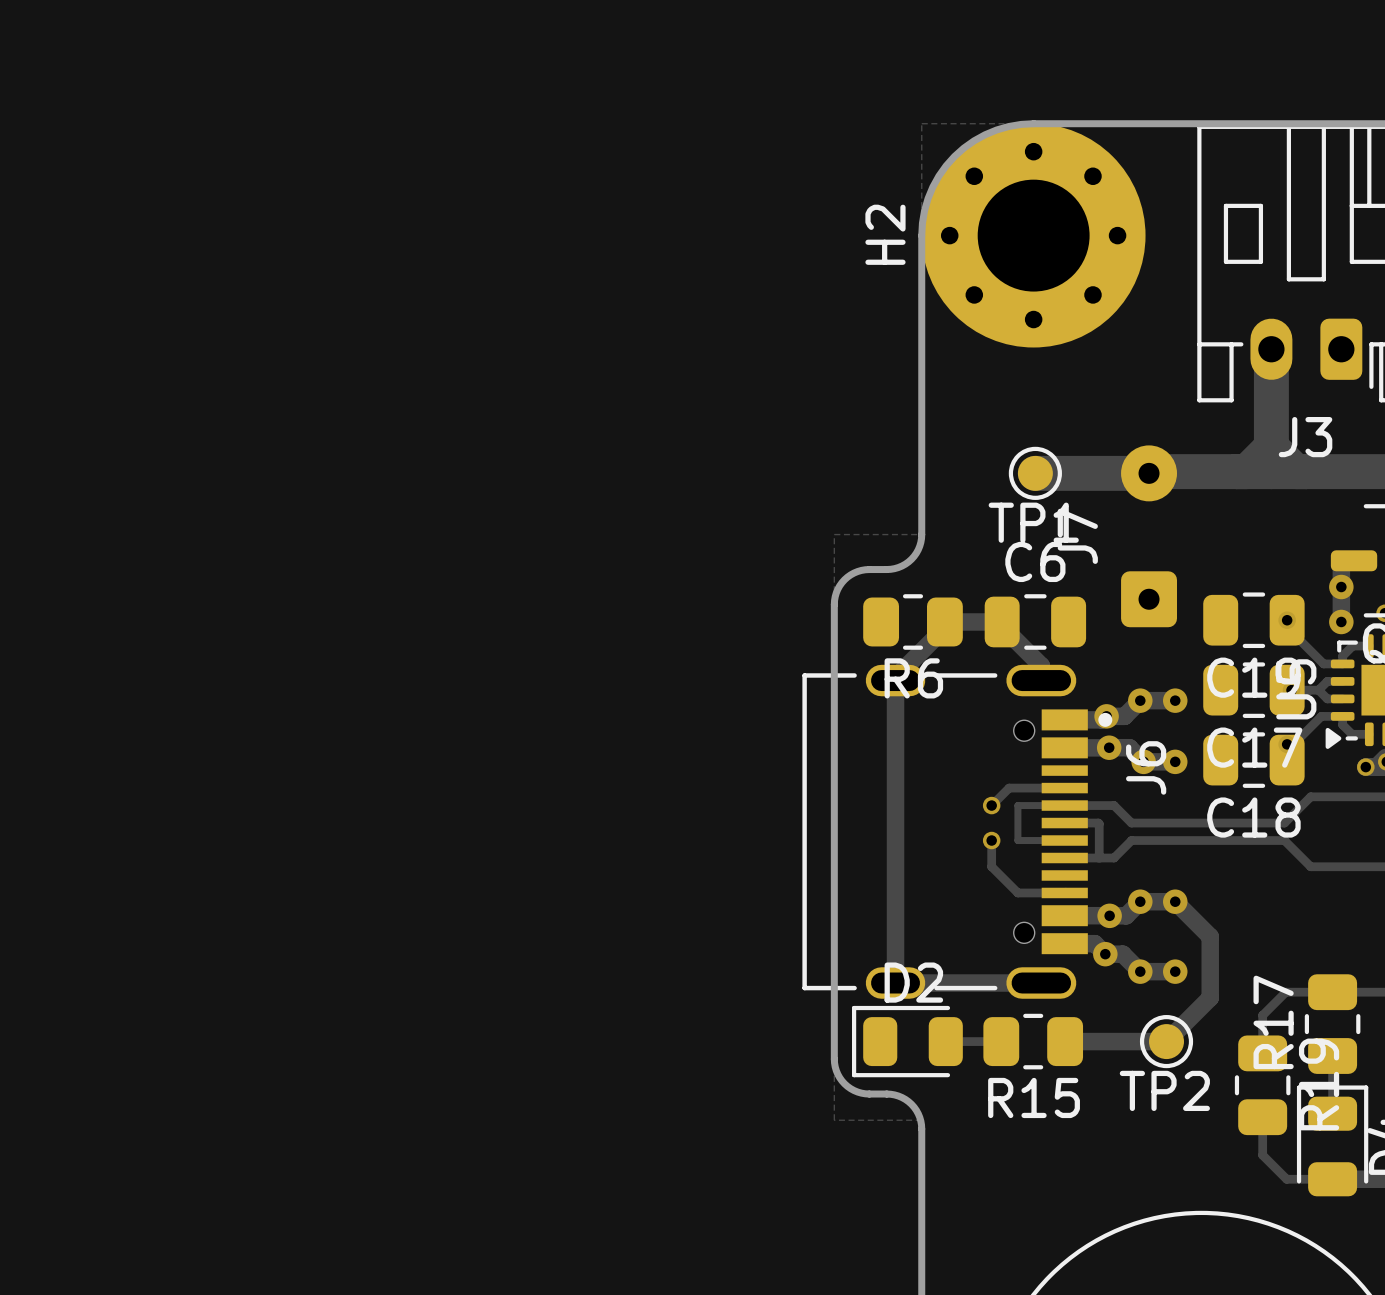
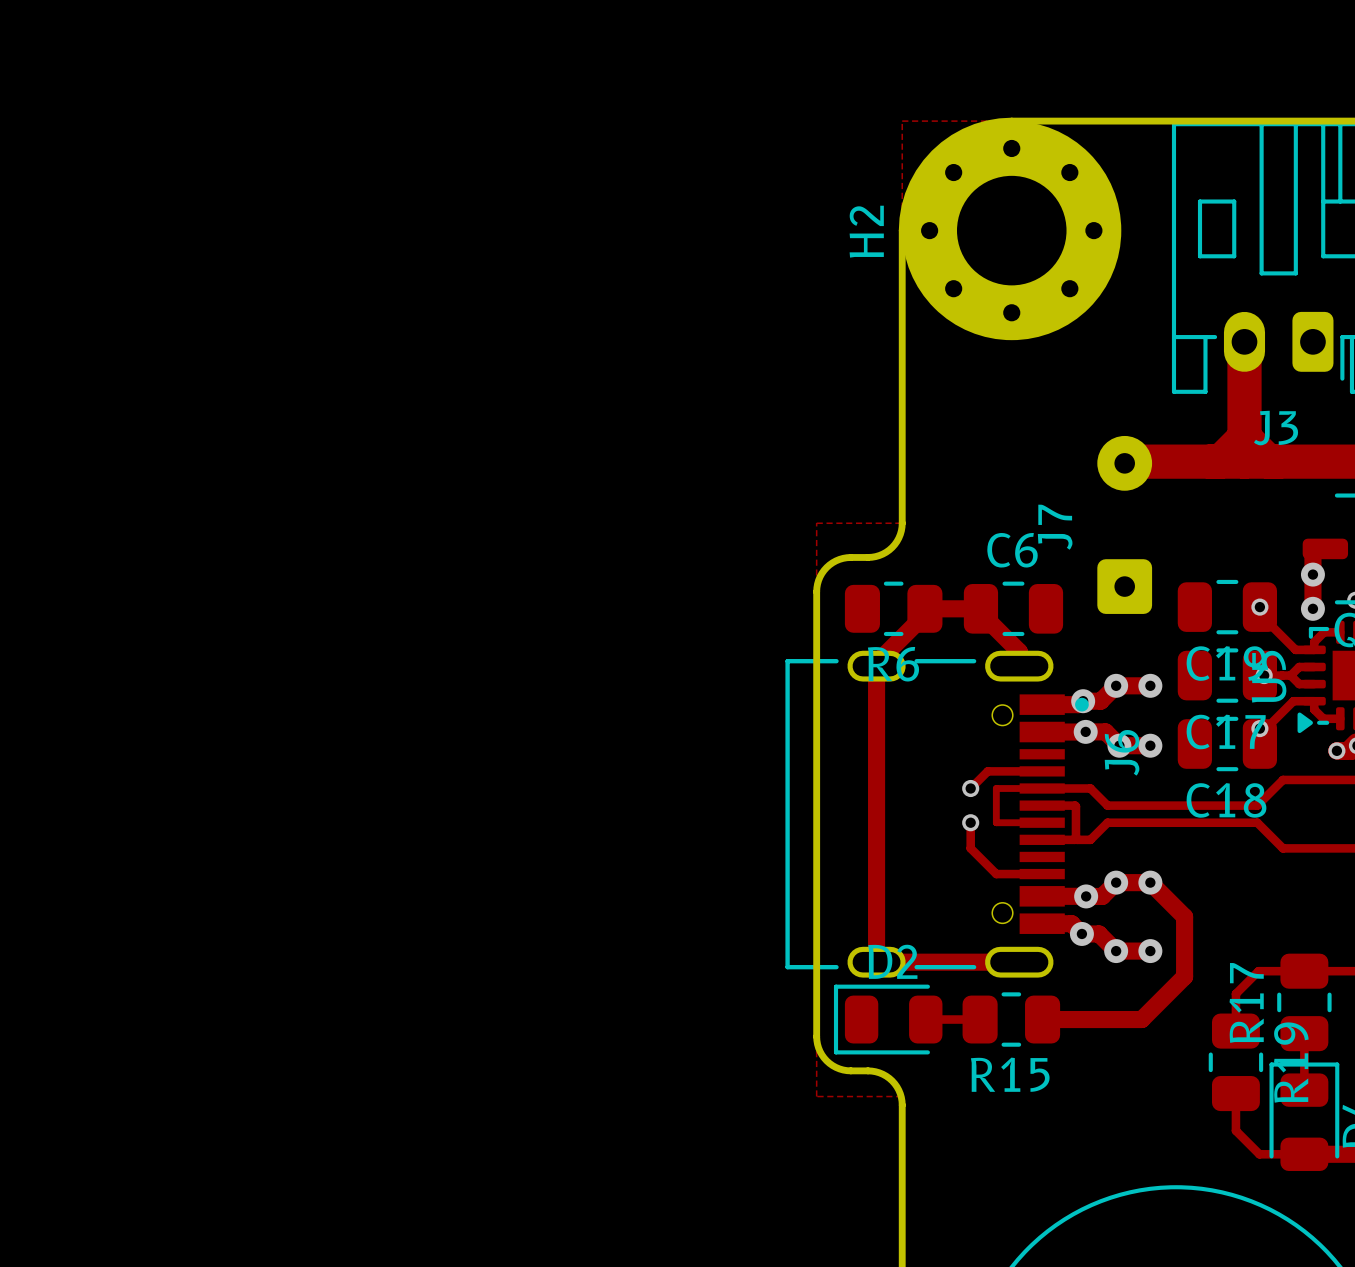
track: (1035, 473) (1149, 473) -> none
TP1: (1035, 473) -> none
TP2: (1166, 1041) -> none

